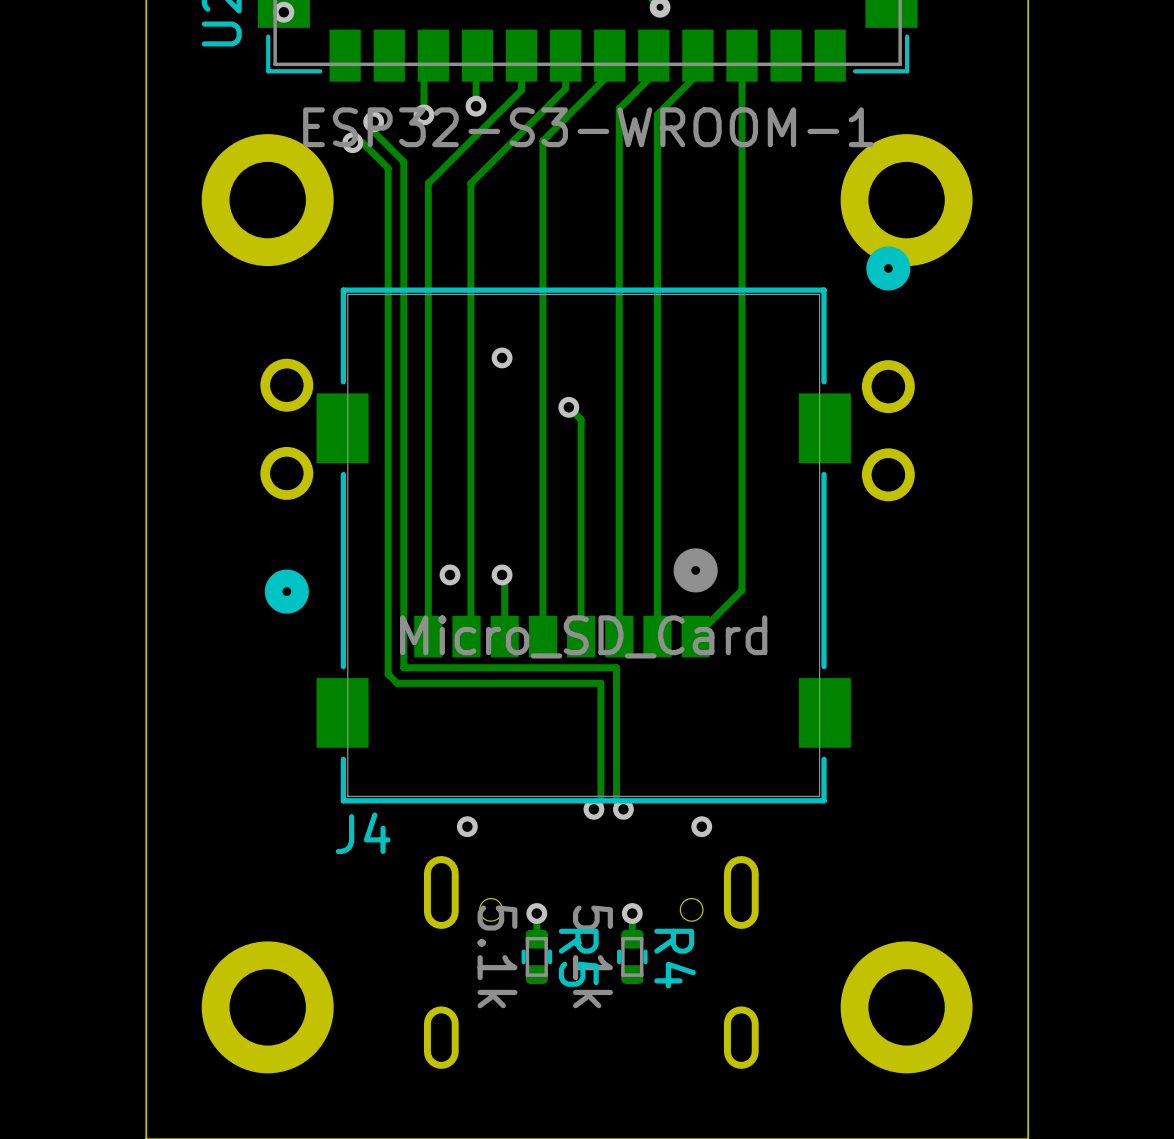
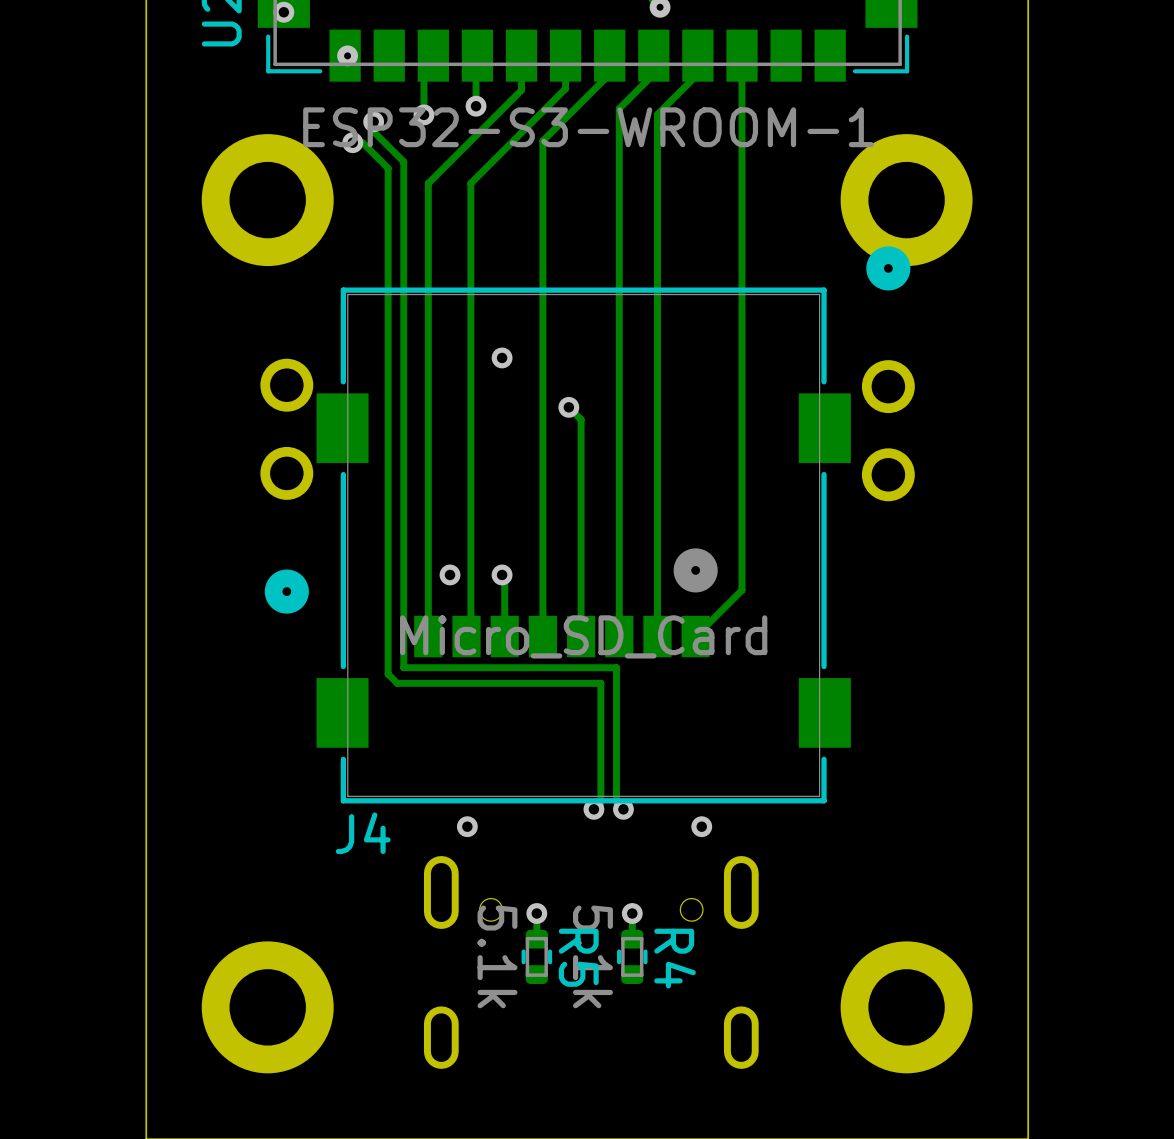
via: none -> (347, 55)

